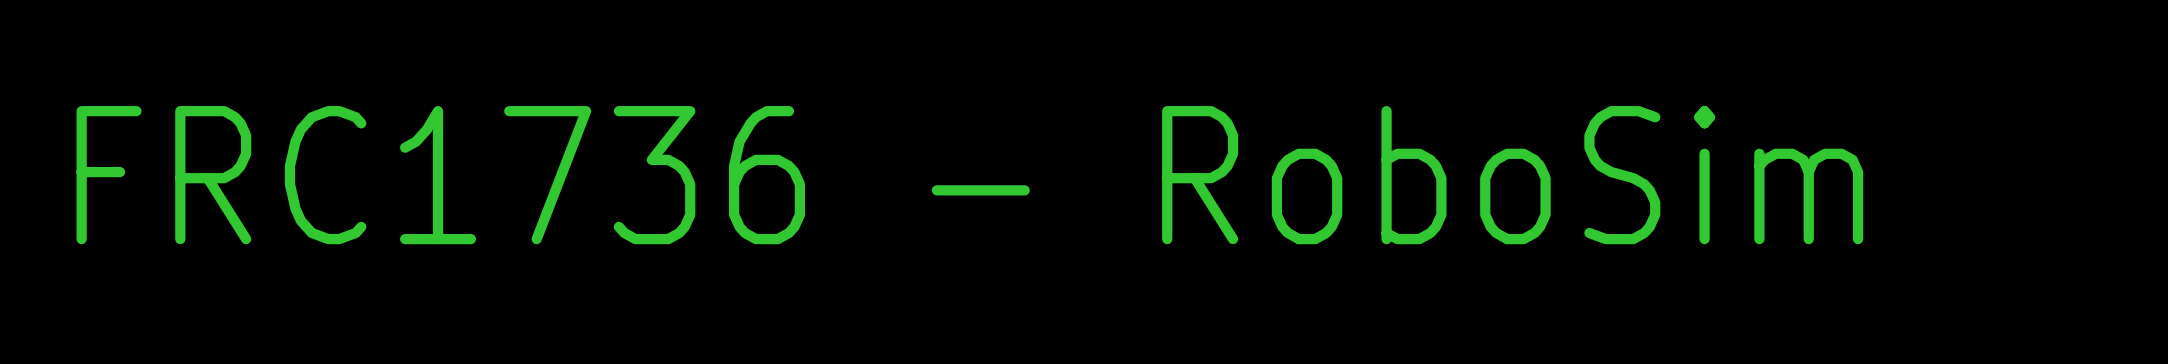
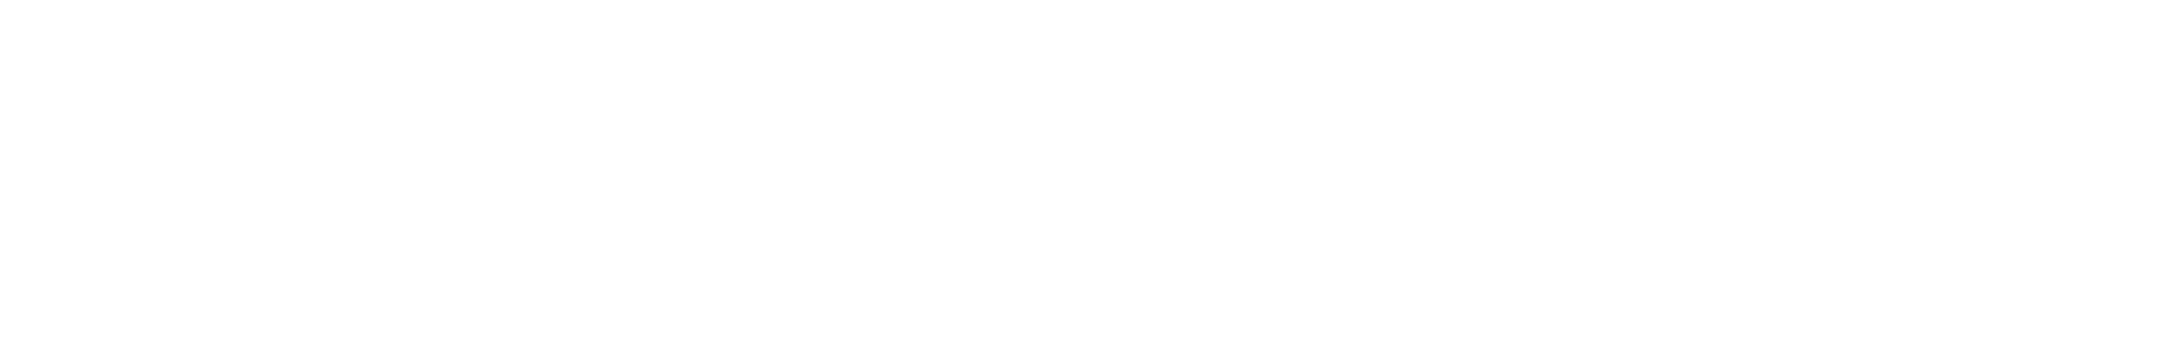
text: FRC1736 - RoboSim (969, 175) -> none

